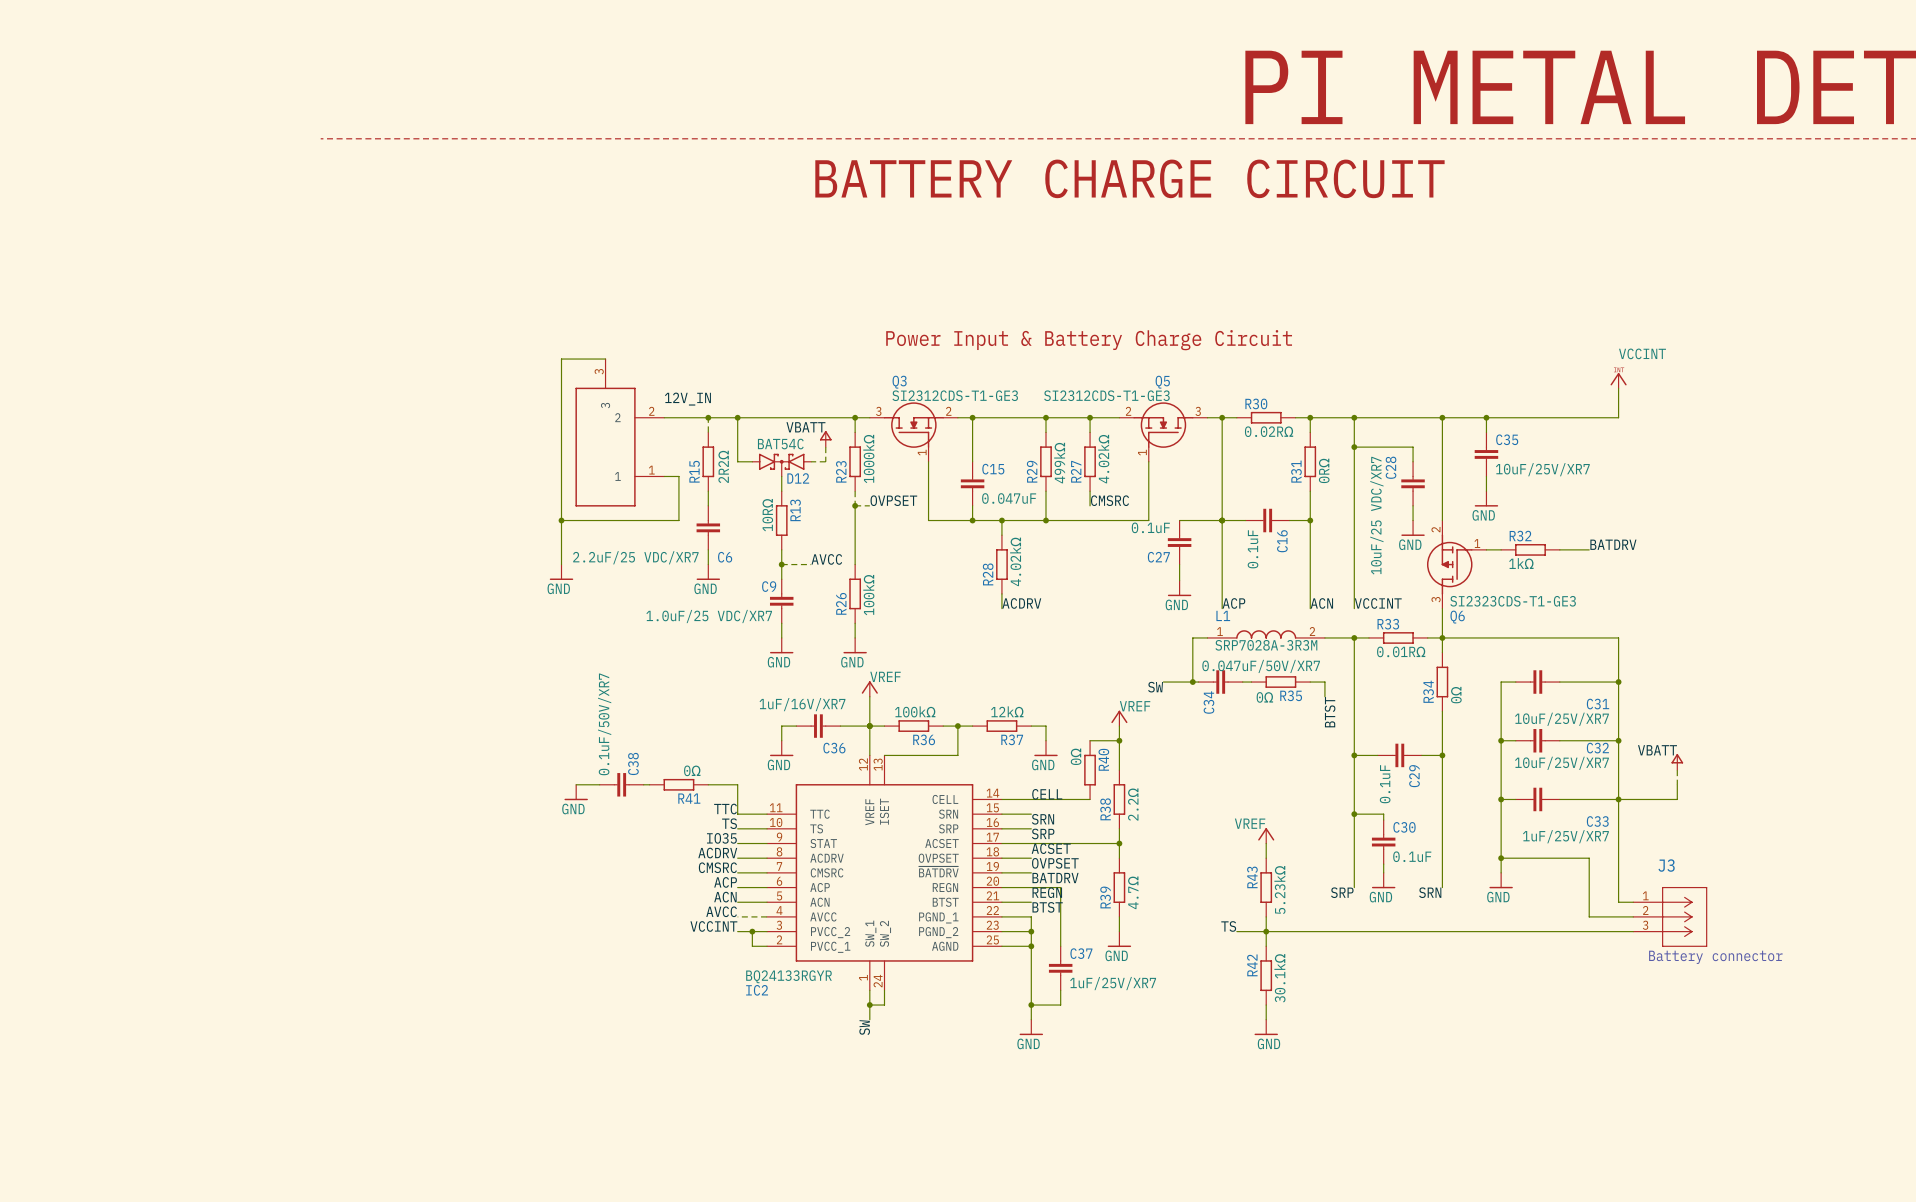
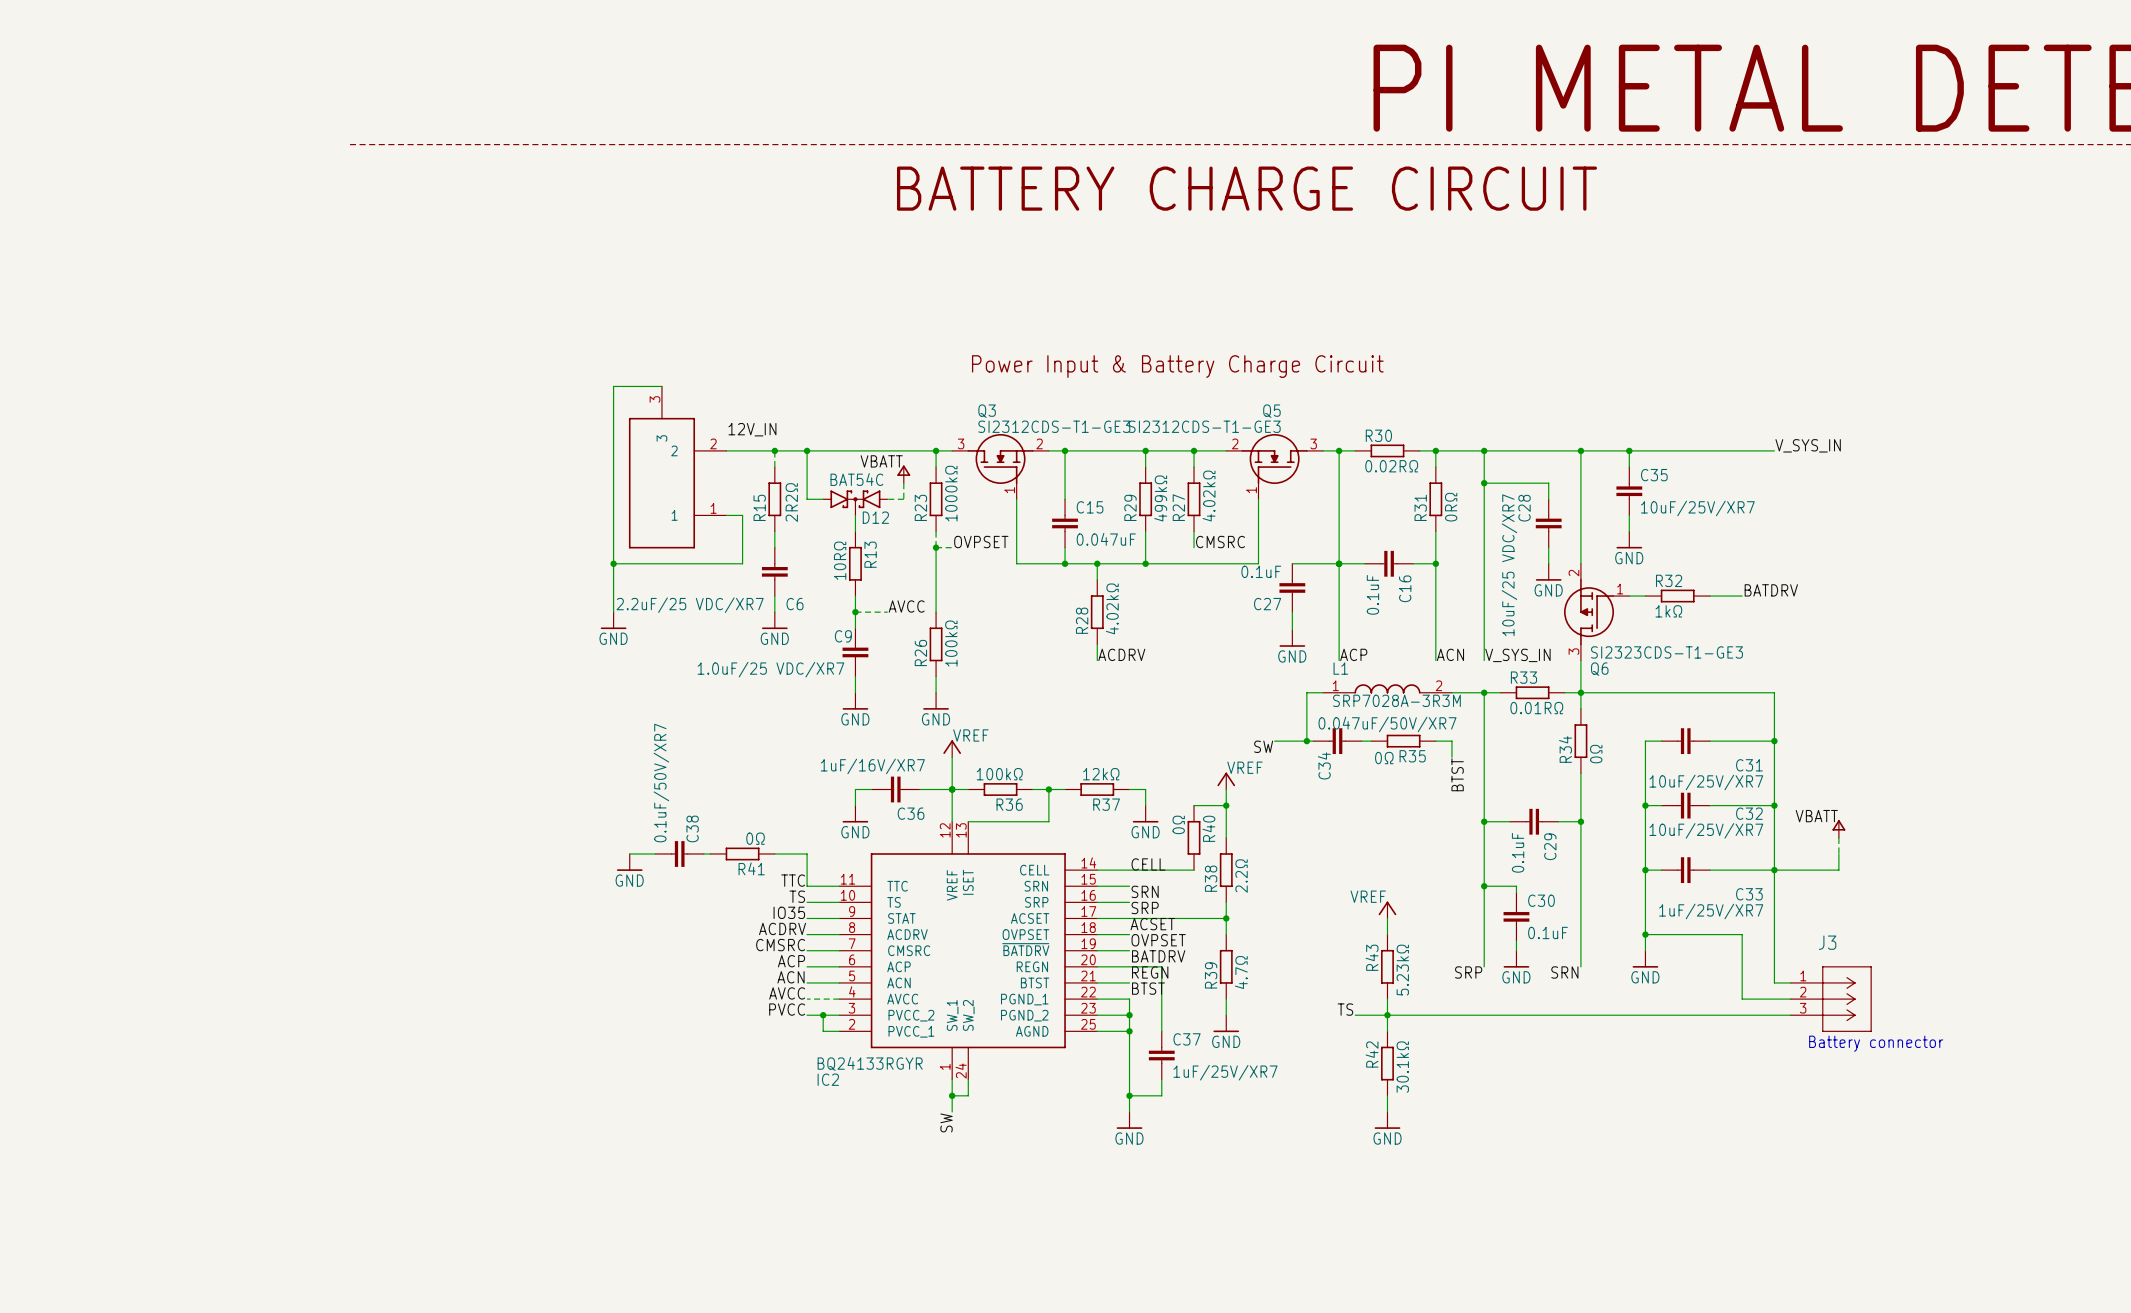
power symbol: VCCINT (1618, 380) -> none
wire: (1618, 388) (1618, 417) -> none
label: none -> V_SYS_IN (1808, 445)
label: VCCINT (1378, 603) -> V_SYS_IN (1517, 655)
label: VCCINT (713, 926) -> PVCC (787, 1009)

